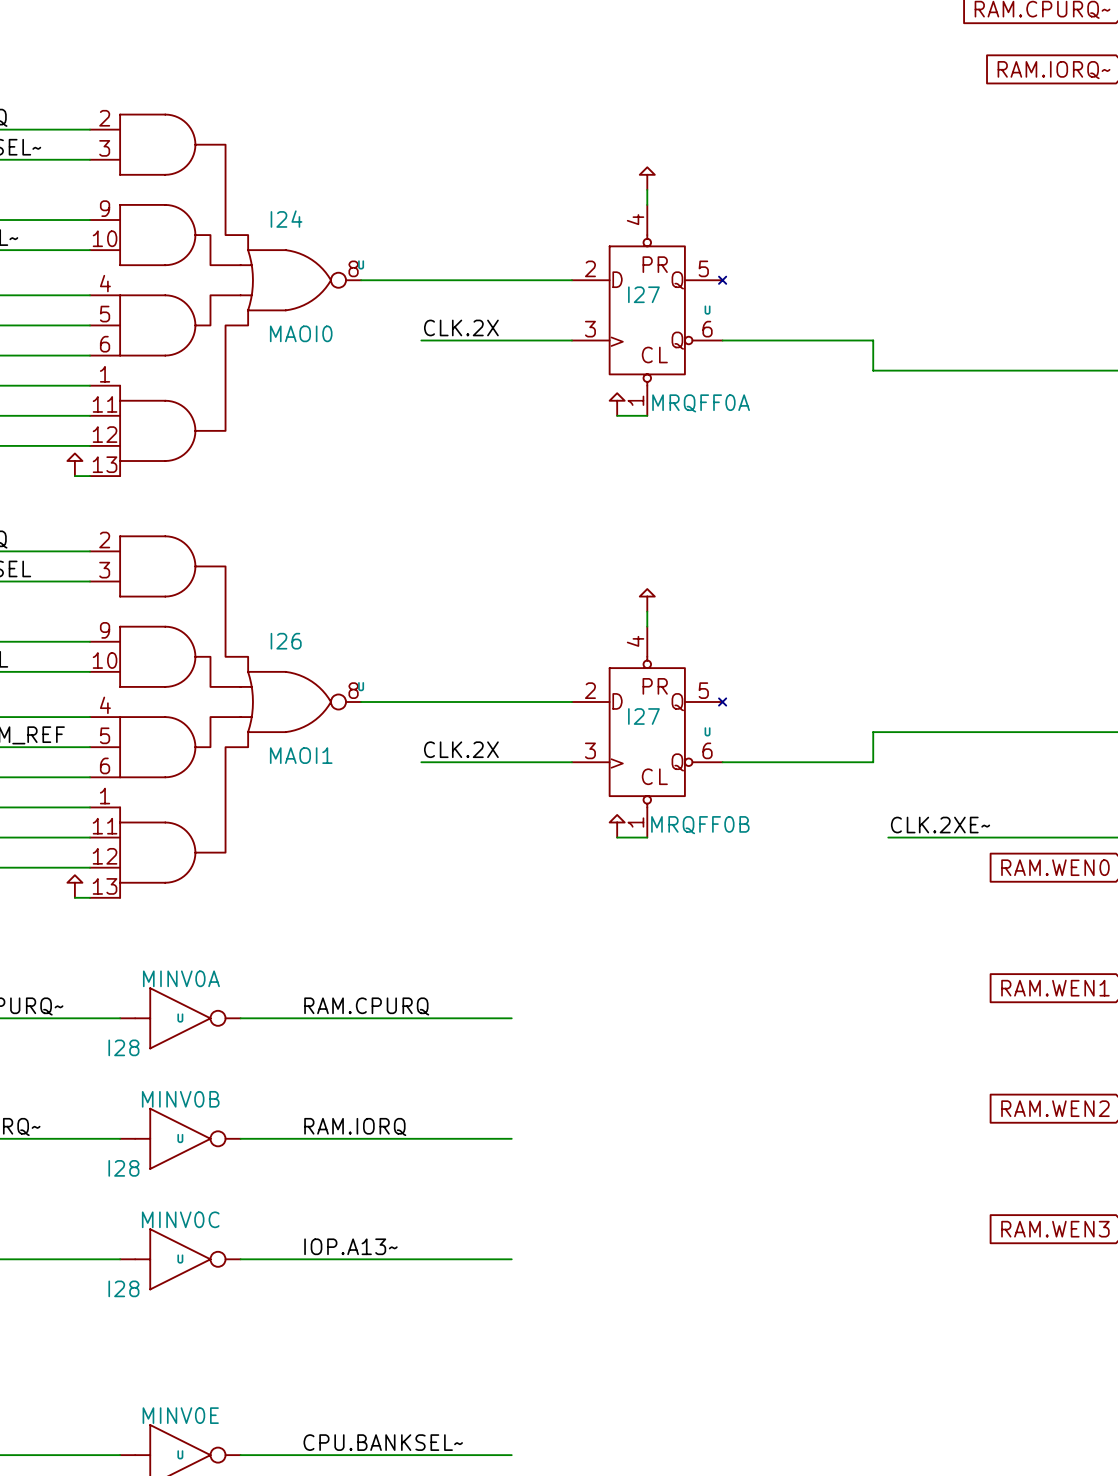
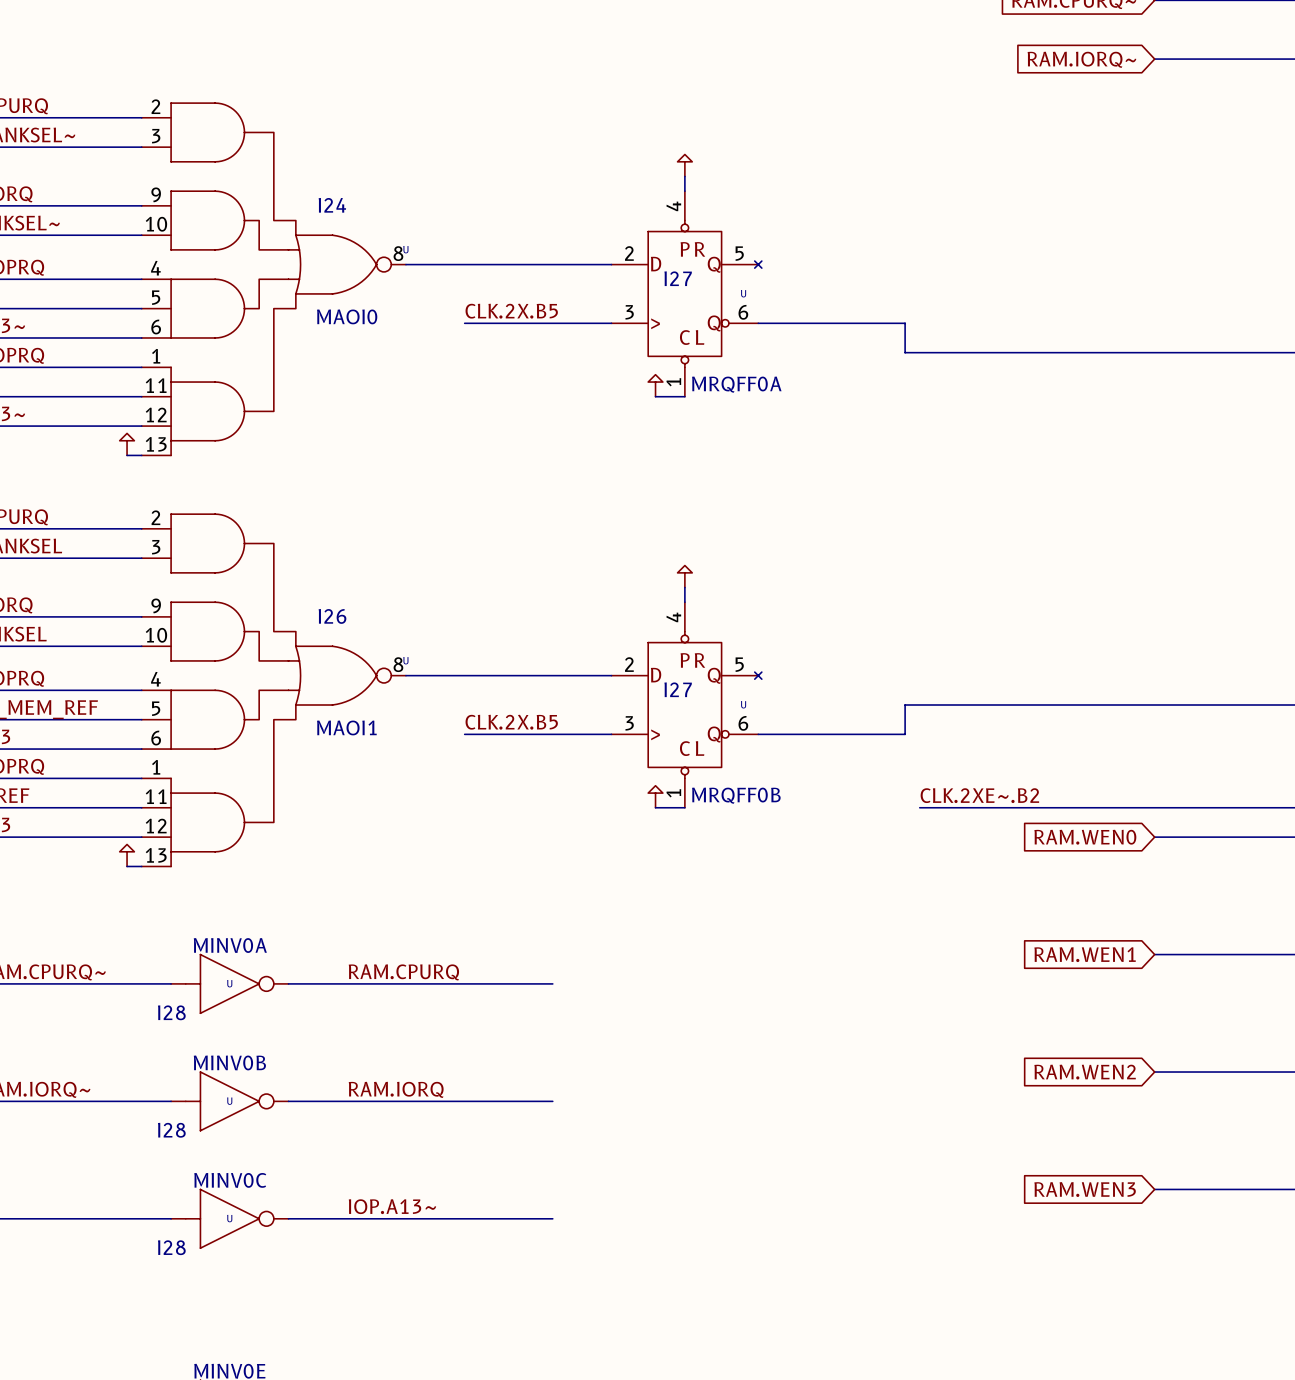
label: CLK.2X (461, 327) -> CLK.2X.B5 (511, 311)
label: CLK.2X (461, 749) -> CLK.2X.B5 (511, 722)
label: CLK.2XE~ (940, 825) -> CLK.2XE~.B2 (979, 795)

